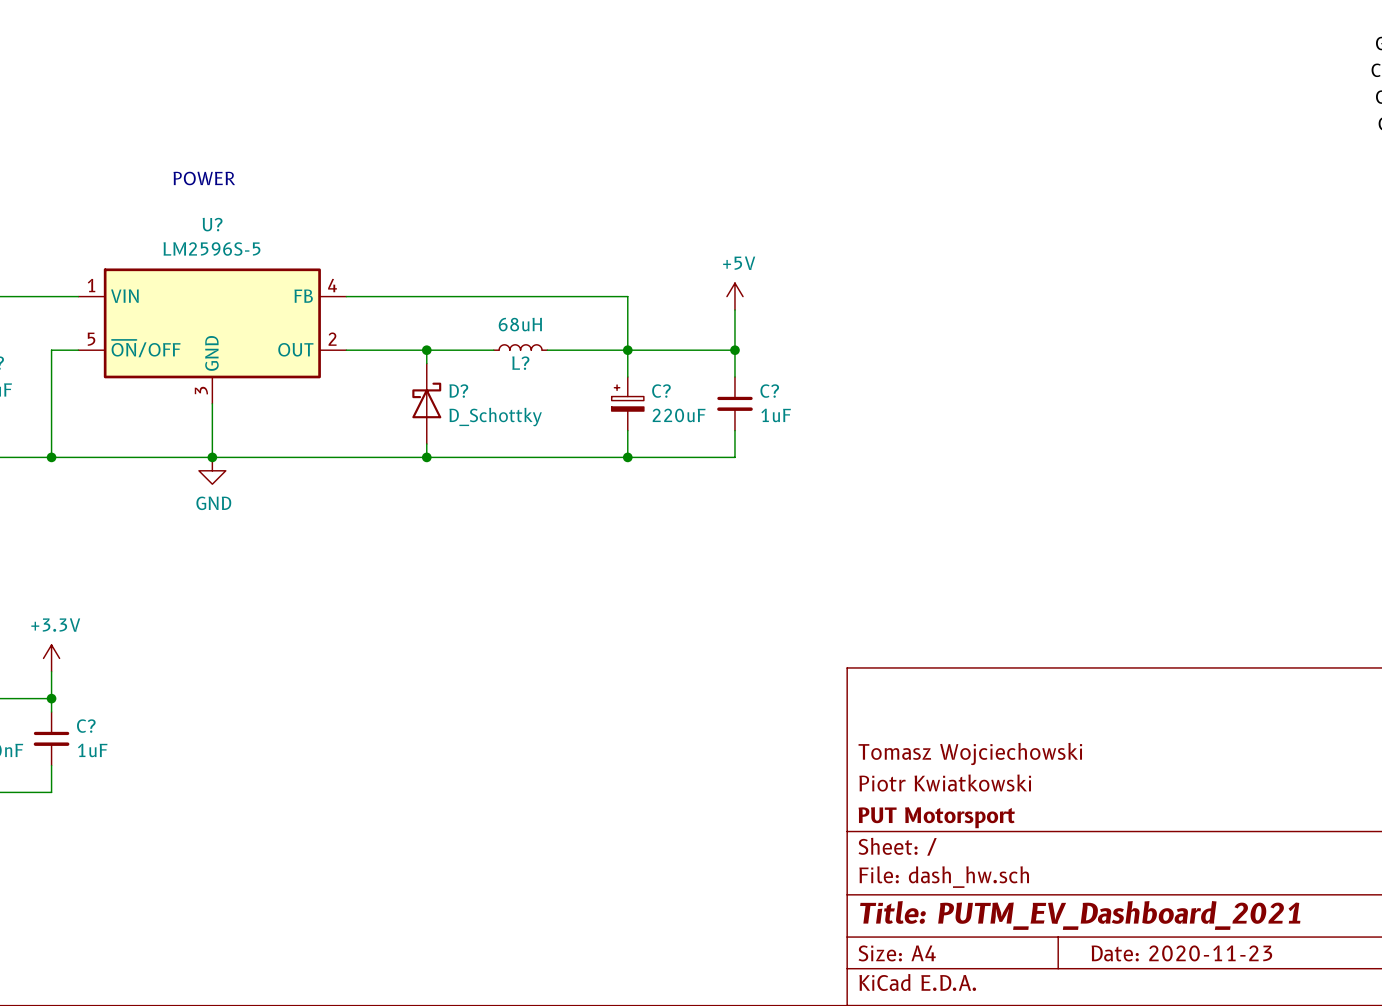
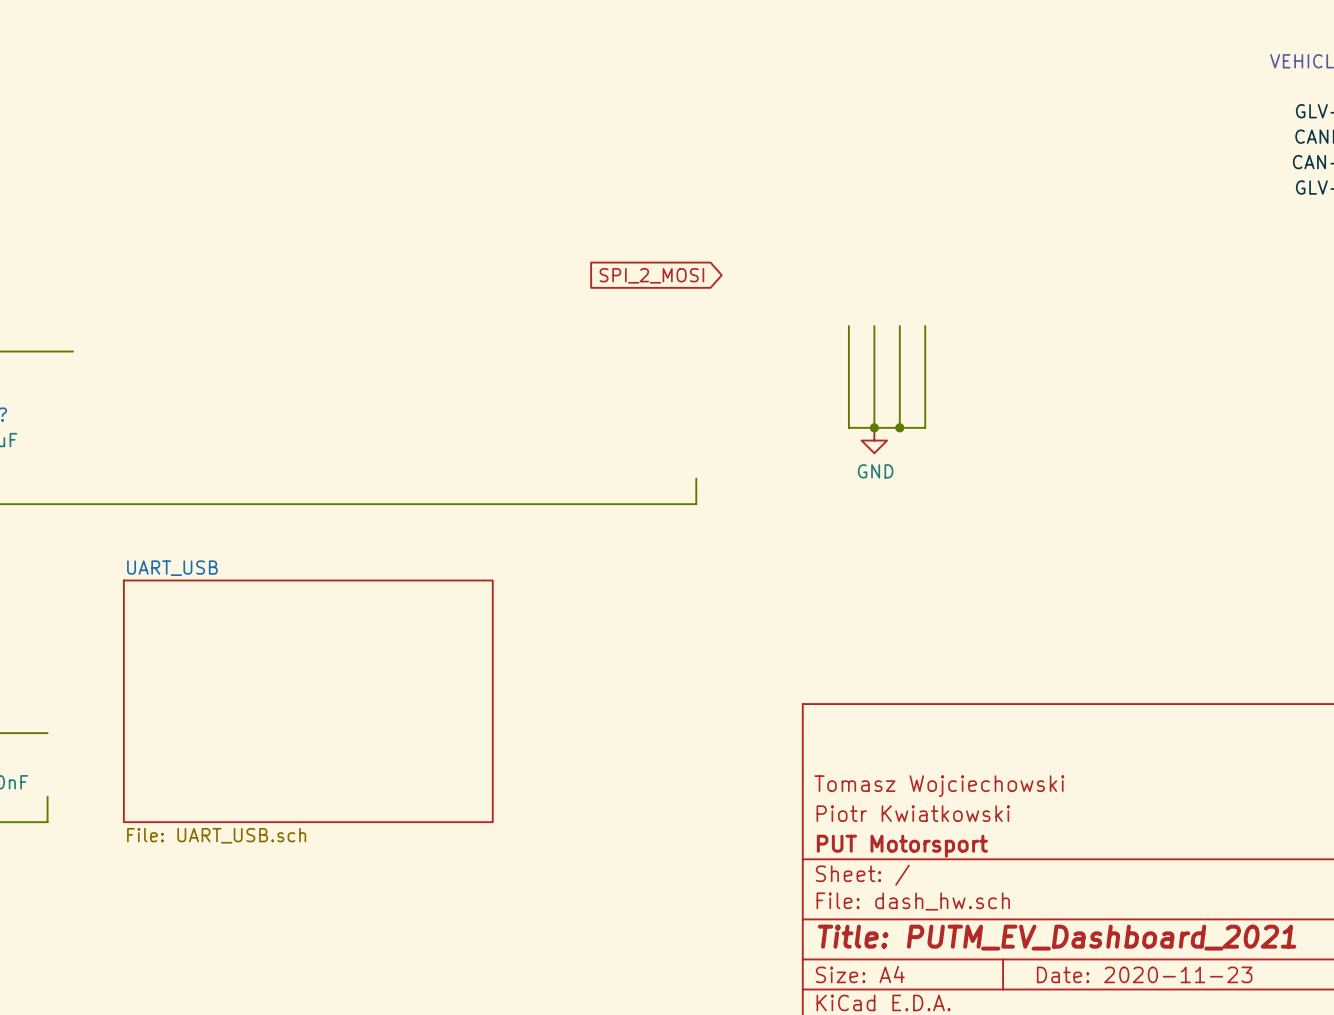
text: POWER (204, 178) -> none
global label: none -> SPI_2_MOSI (651, 275)
wire: none -> (848, 326) (848, 427) (925, 427) (925, 326)
wire: none -> (874, 326) (874, 427)
wire: none -> (899, 326) (899, 427)
wire: (346, 296) (627, 296) (627, 376) -> none
power symbol: +5V (734, 296) -> none
wire: (734, 309) (734, 376) -> none
U?: LM2596S-5 (212, 336) -> none
L?: 68uH (520, 347) -> none
wire: (78, 350) (51, 350) (51, 457) -> none
wire: (346, 350) (493, 350) -> none
wire: (426, 350) (426, 363) -> none
junction: (426, 350) -> none
wire: (547, 350) (734, 350) -> none
junction: (627, 350) -> none
junction: (734, 350) -> none
junction: none -> (874, 427)
junction: none -> (899, 427)
power symbol: none -> GND (874, 440)
wire: (212, 403) (212, 457) -> none
D?: D_Schottky (426, 403) -> none
C?: 220uF (627, 403) -> none
C?: 1uF (734, 403) -> none
wire: (627, 430) (627, 457) -> none
wire: (426, 444) (426, 457) -> none
junction: (51, 457) -> none
junction: (212, 457) -> none
junction: (426, 457) -> none
junction: (627, 457) -> none
power symbol: GND (212, 470) -> none
power symbol: +3.3V (51, 658) -> none
sheet UART_USB: none -> File: UART_USB.sch (308, 701)
wire: (51, 671) (51, 712) -> none
junction: (51, 698) -> none
C?: 1uF (51, 738) -> none

